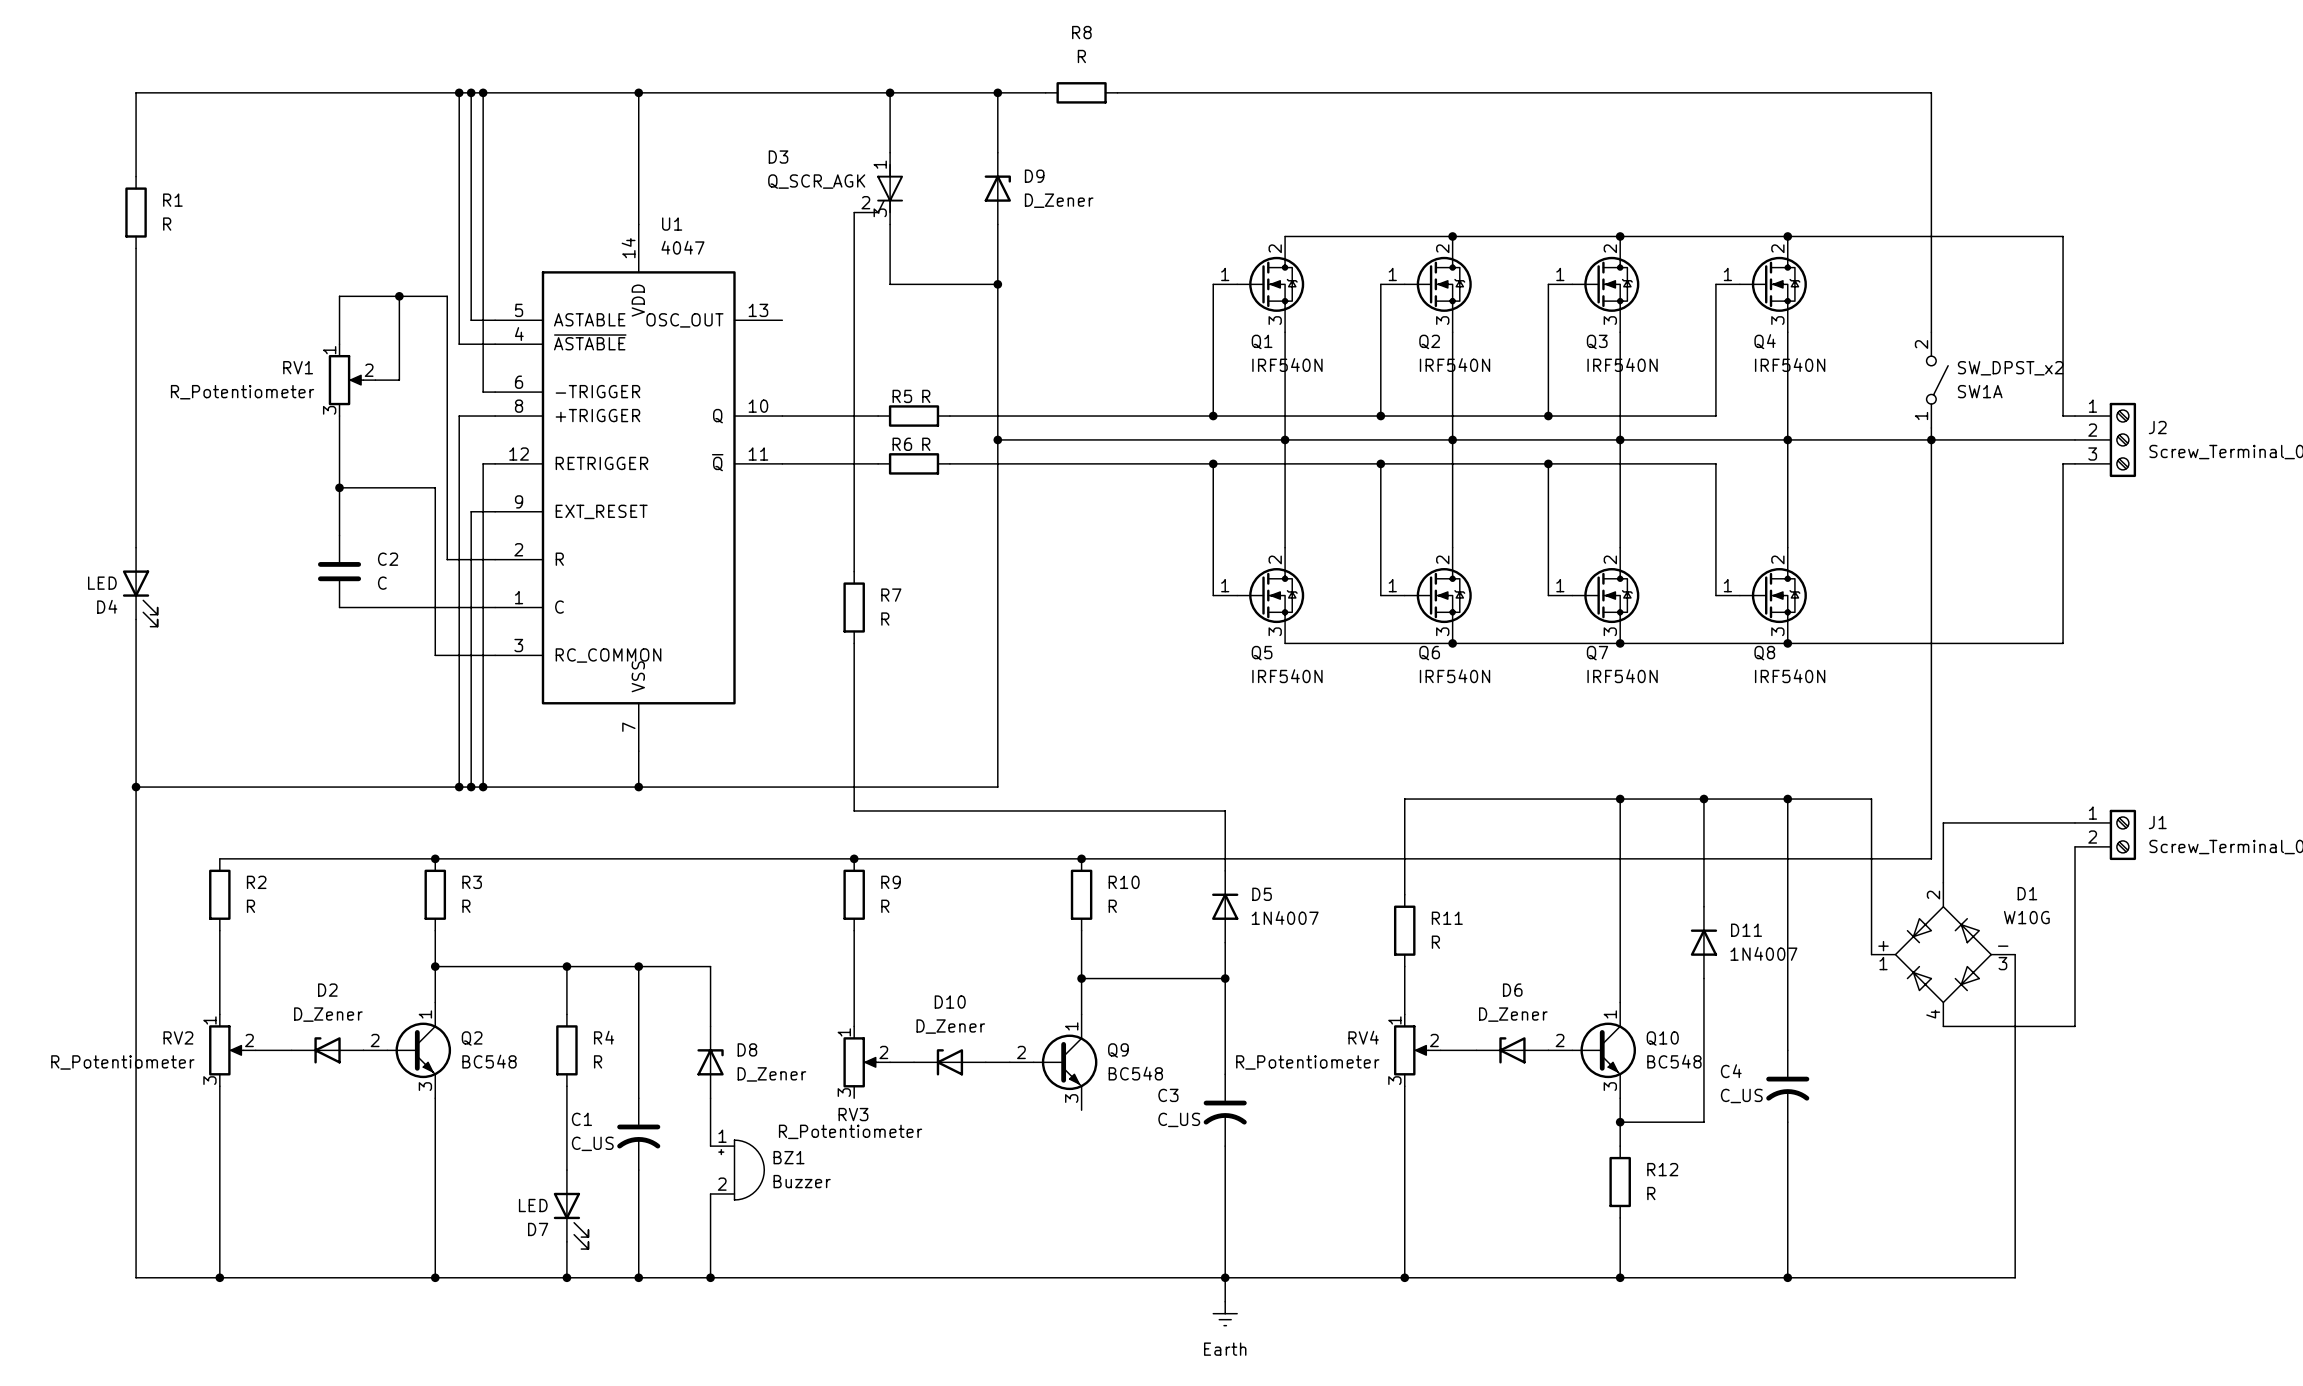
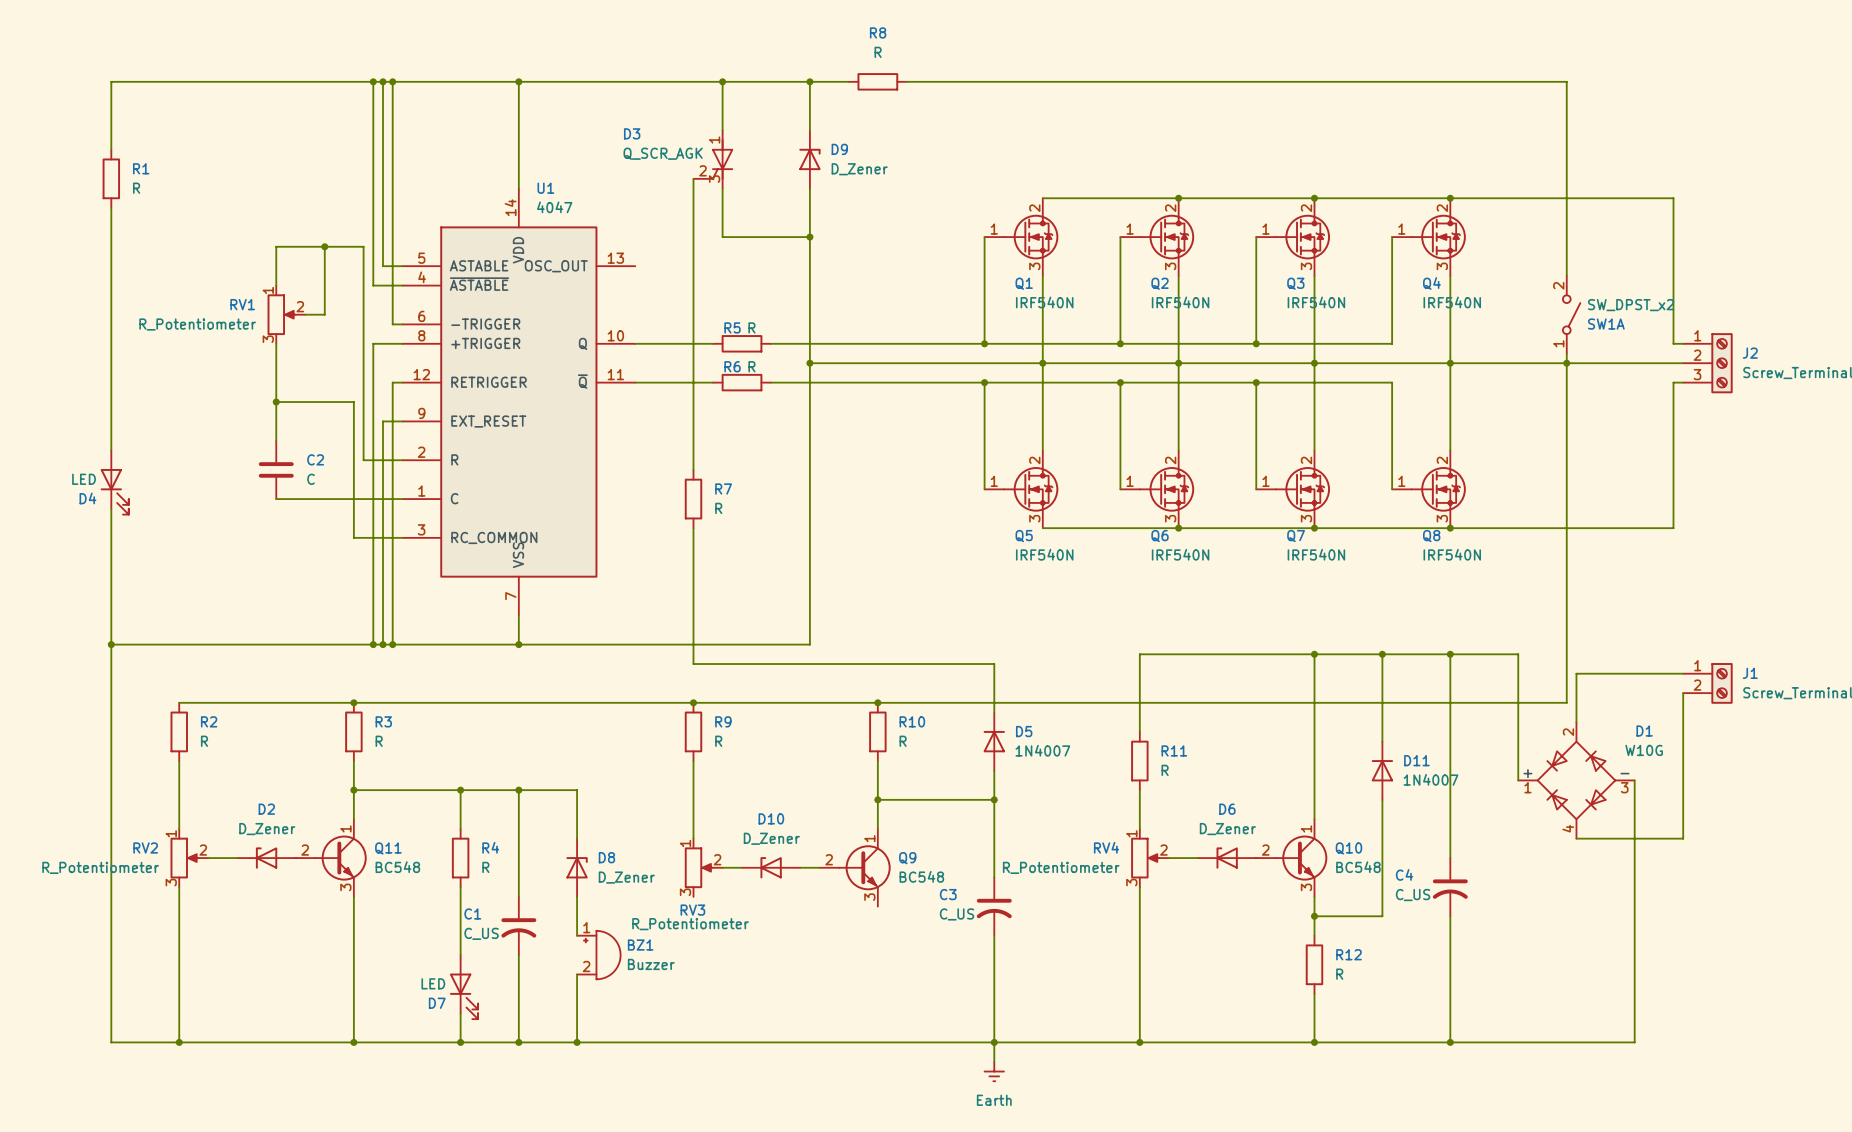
Q2 name: Q2 (472, 1038) -> Q11 (388, 848)

